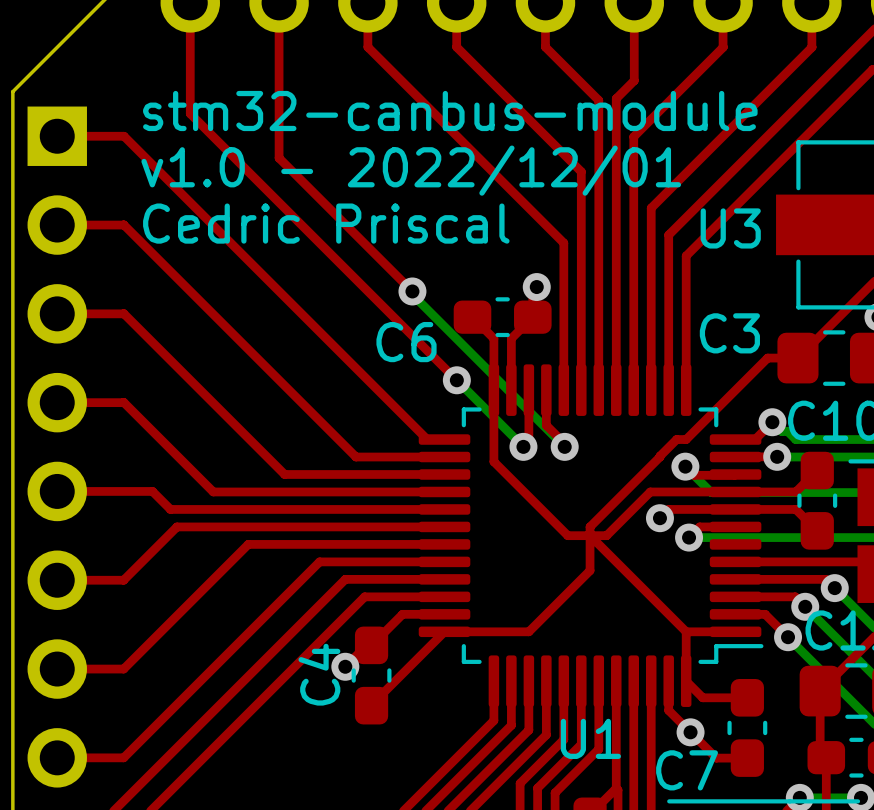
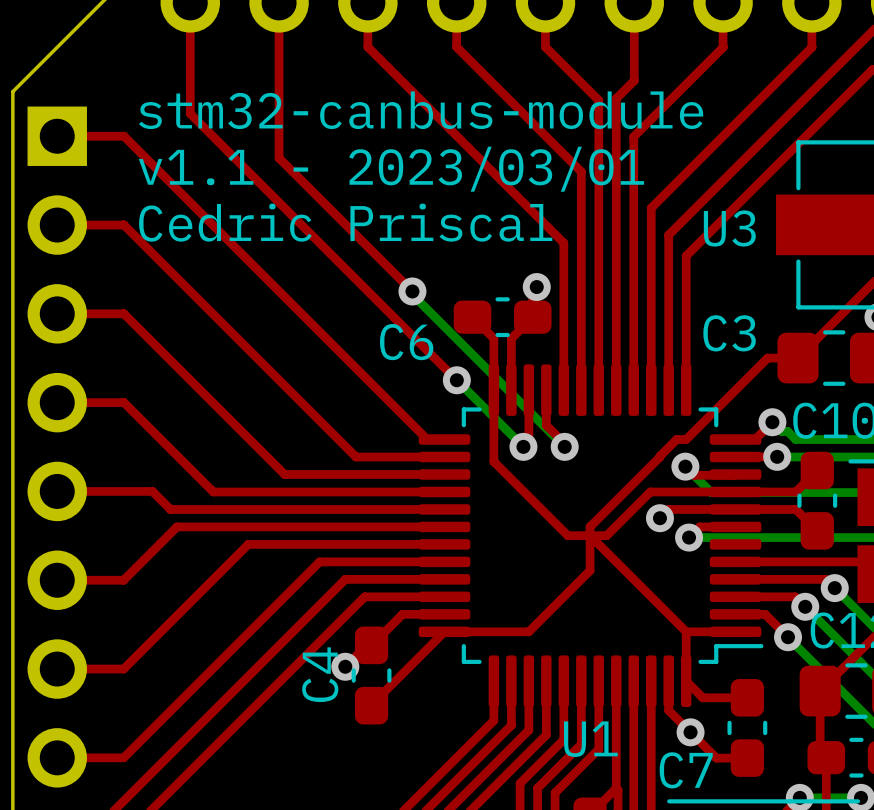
text: v1.0 - 2022/12/01 (411, 170) -> v1.1 - 2023/03/01 (391, 169)

